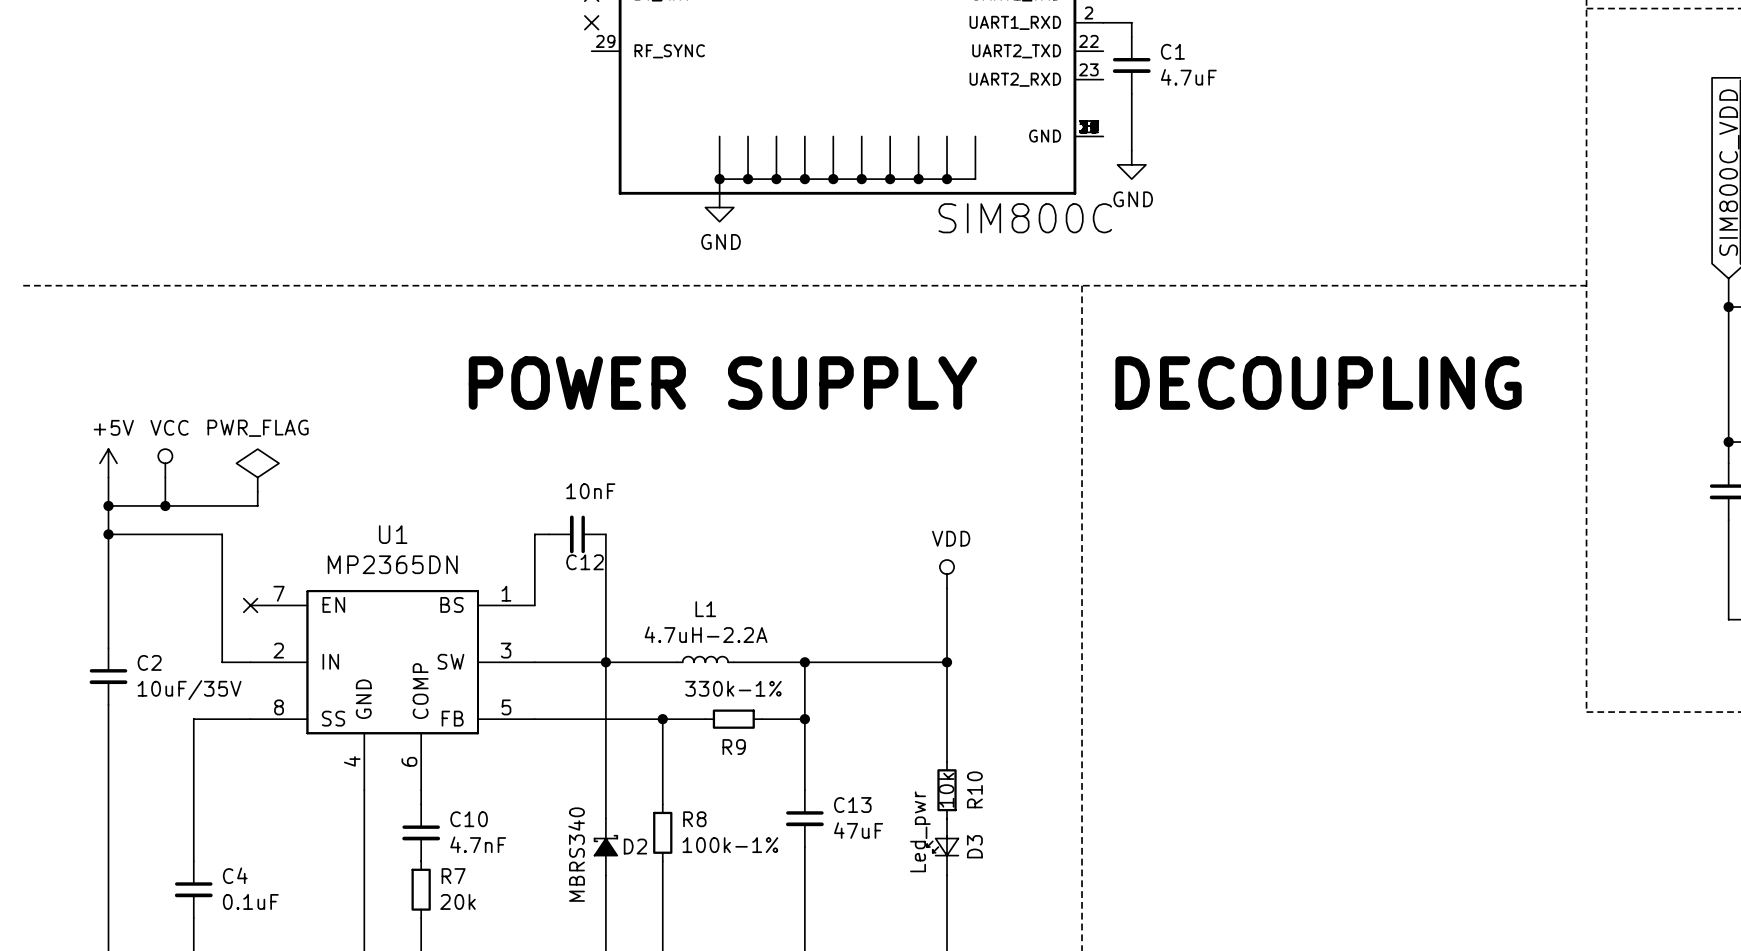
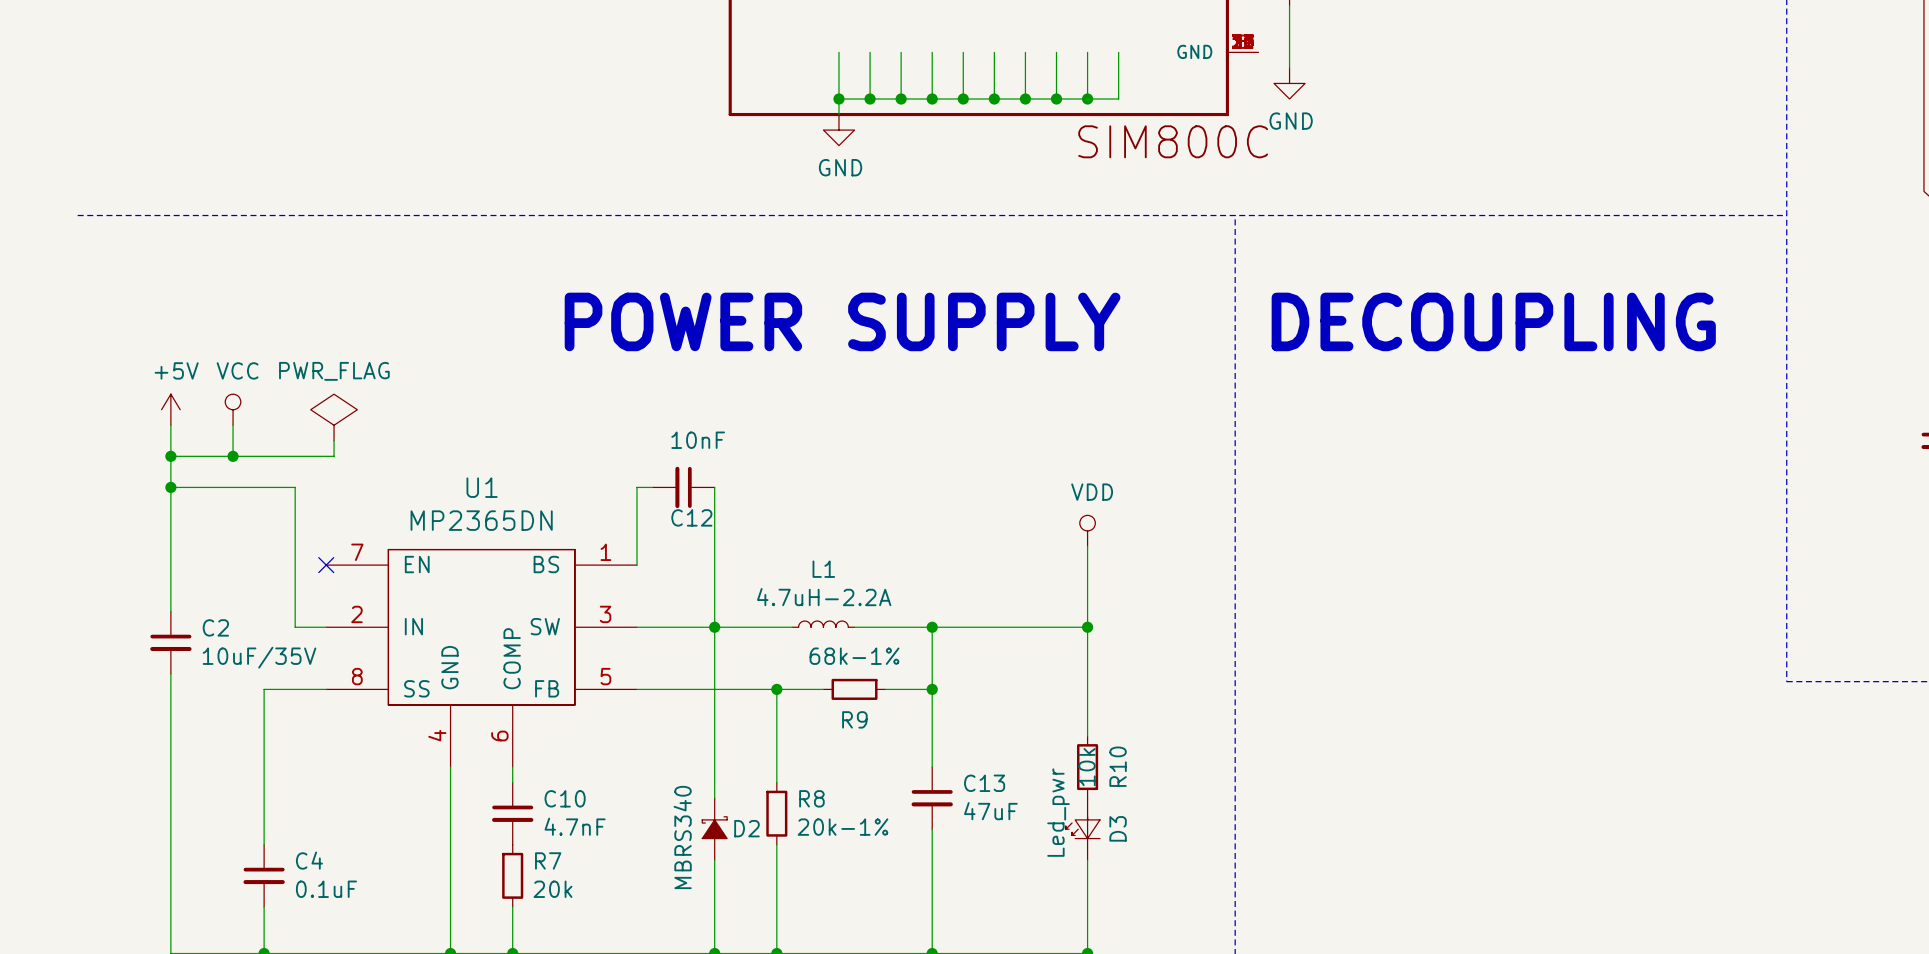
R9 value: 330k-1% (733, 688) -> 68k-1% (854, 656)
R8 value: 100k-1% (730, 845) -> 20k-1% (843, 827)

